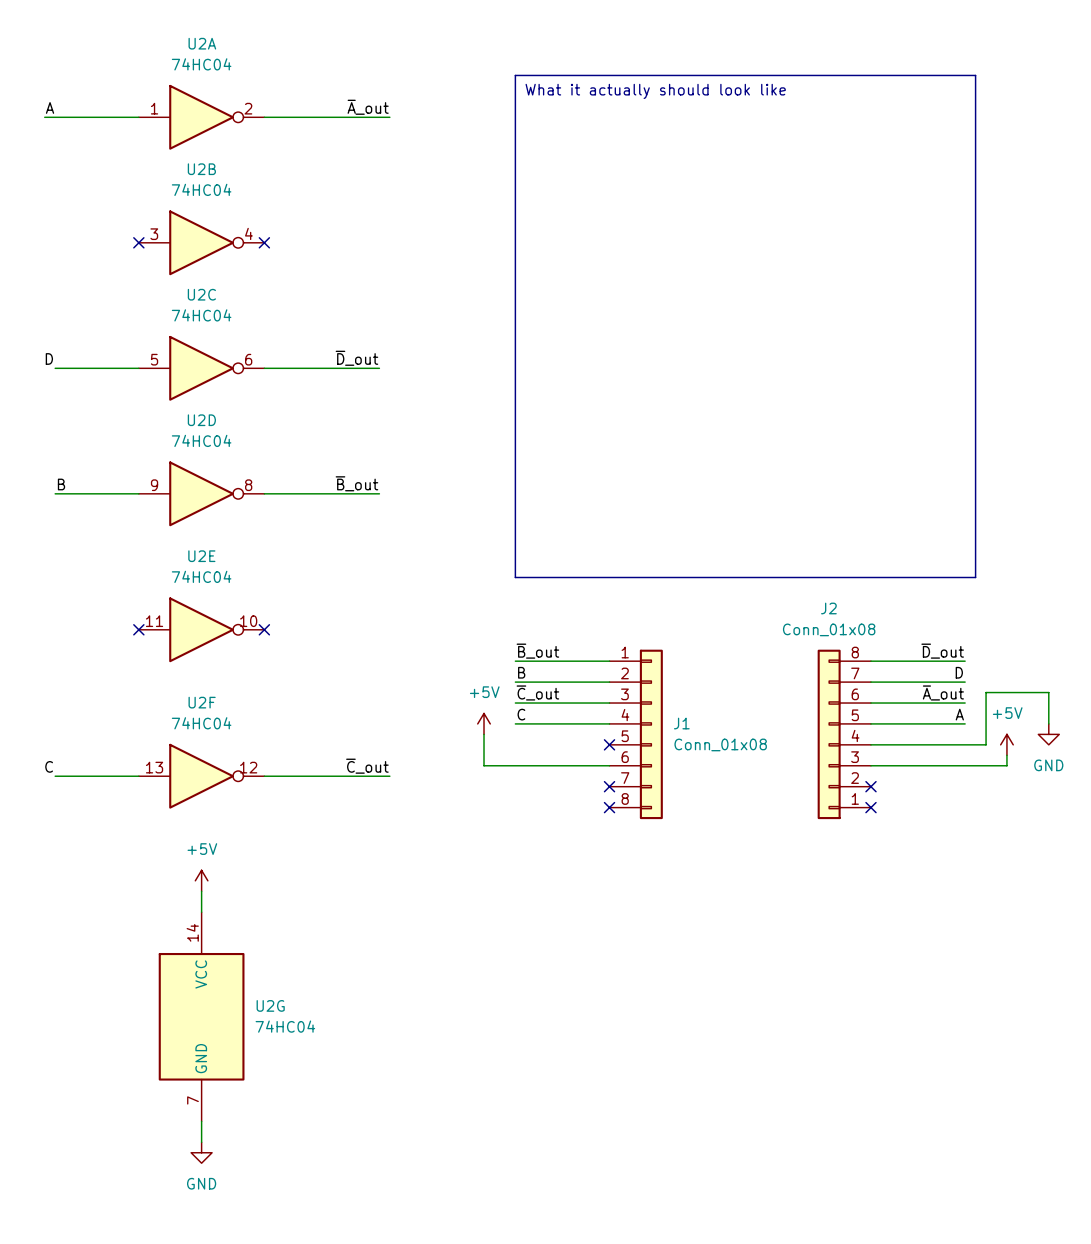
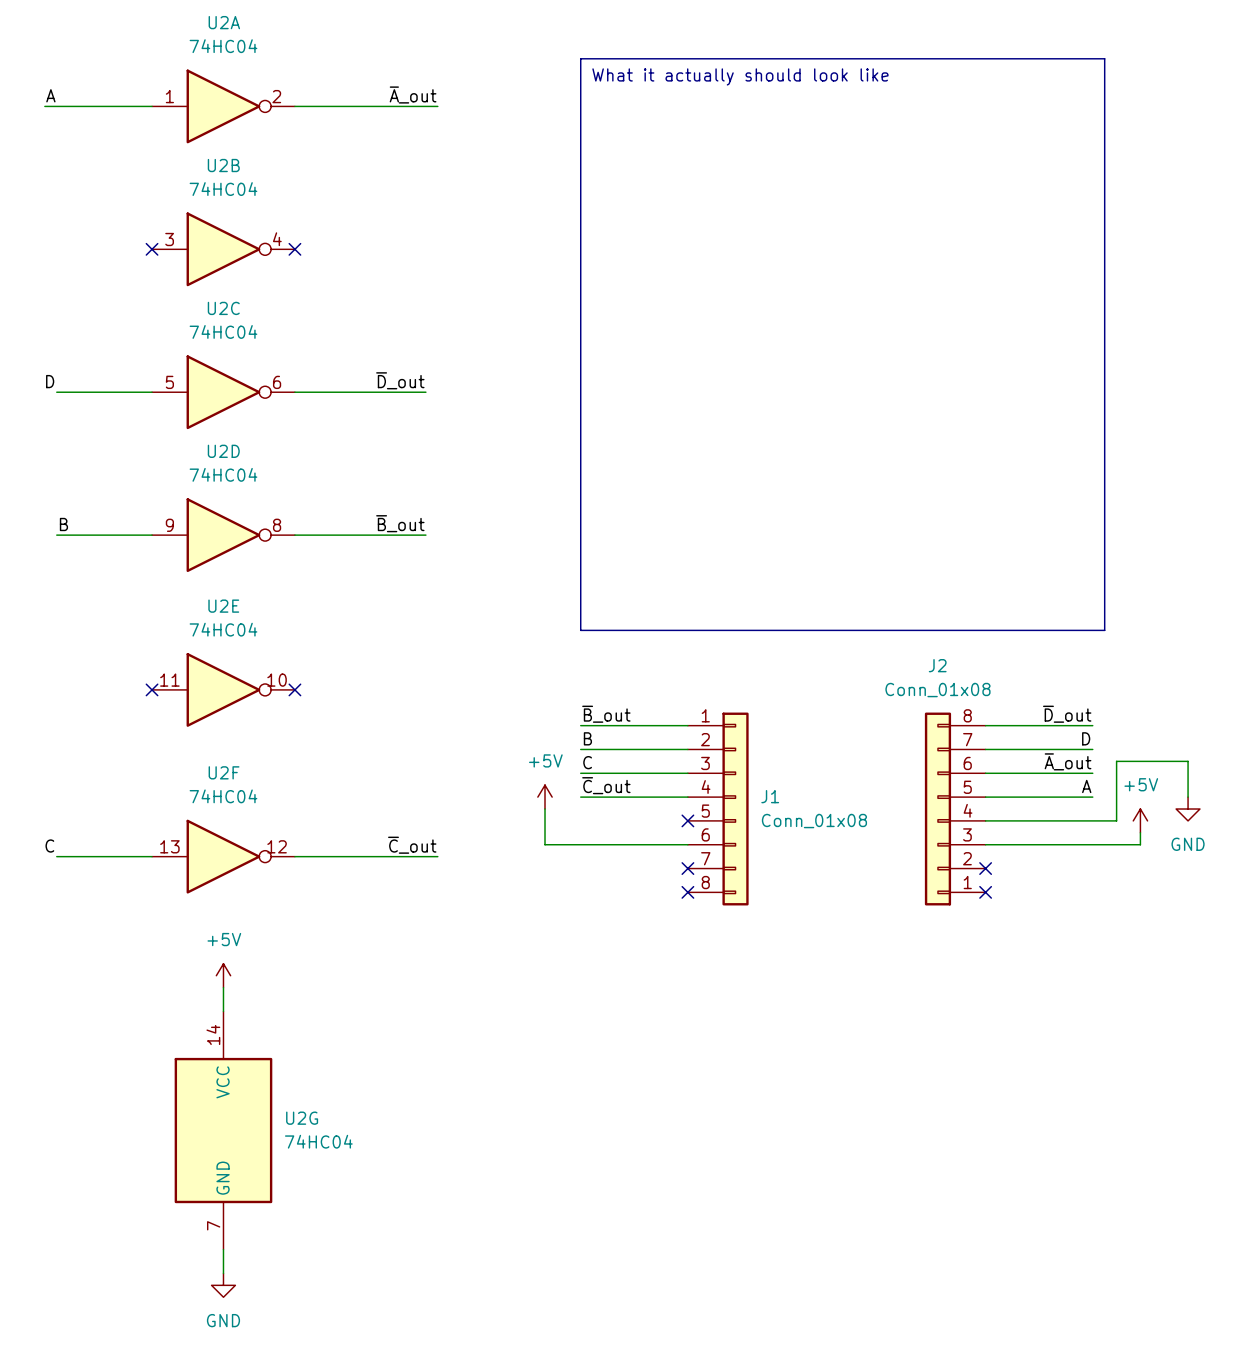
label: ~{C}_out (537, 692) -> C (587, 762)
label: C (521, 714) -> ~{C}_out (606, 785)

